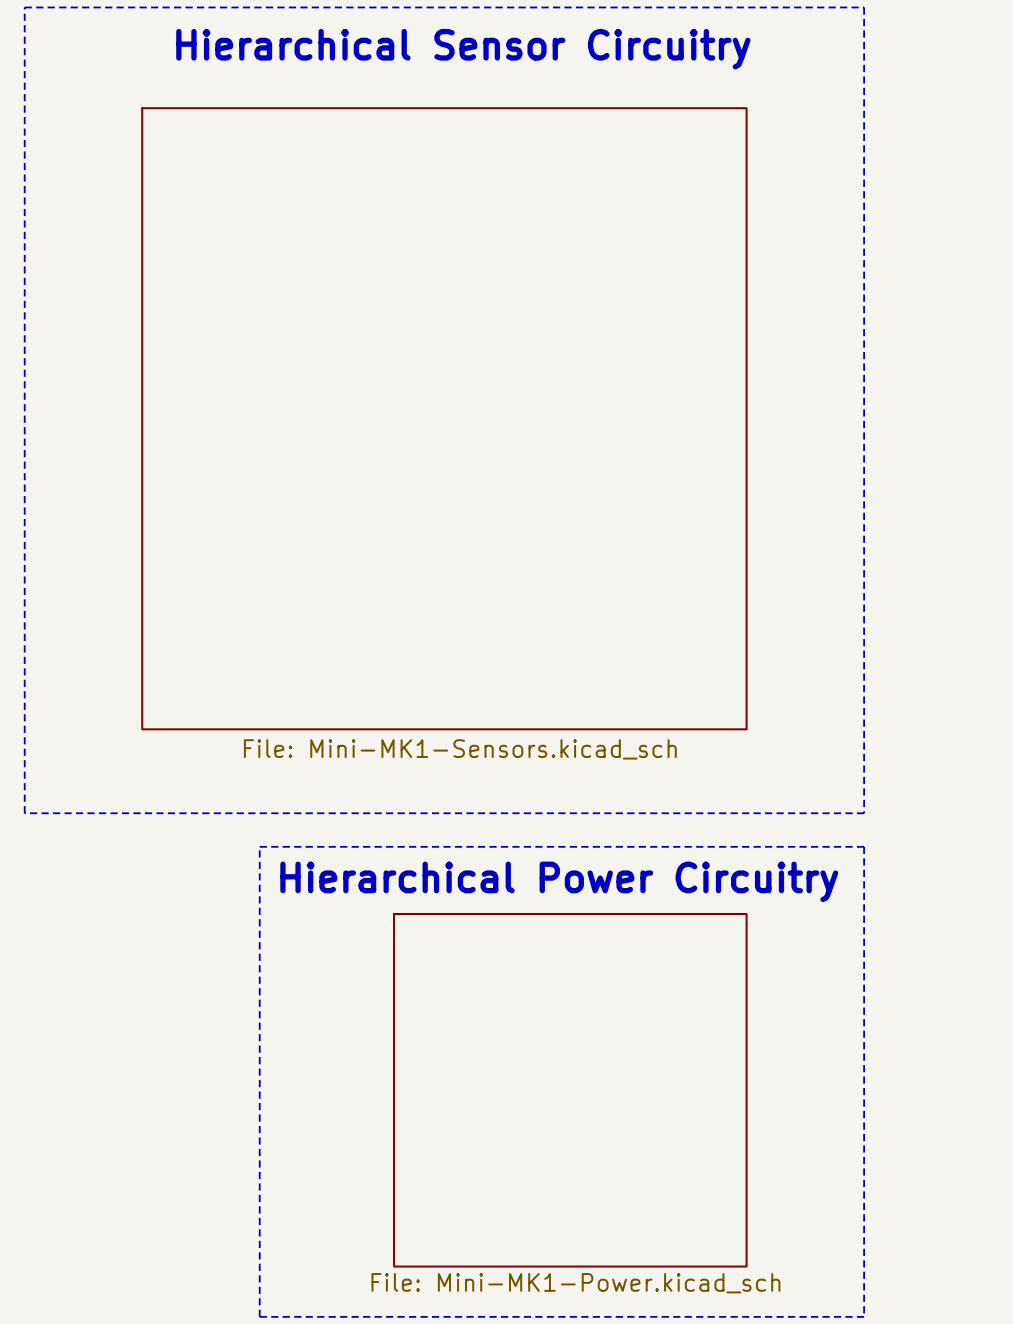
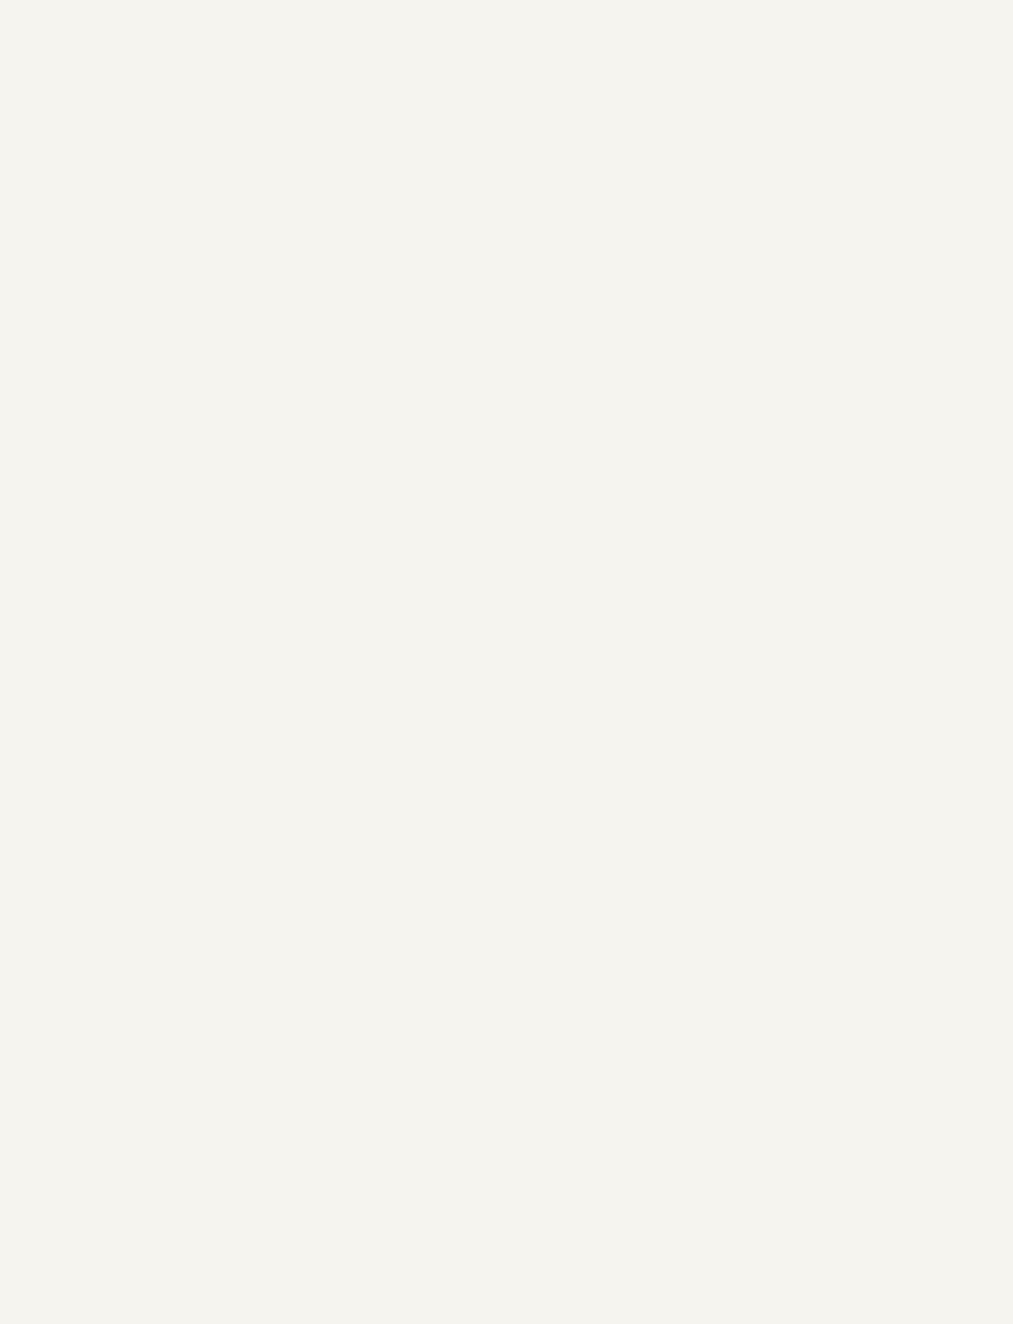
line: (24, 7) (864, 7) (864, 813) (24, 813) (24, 7) -> none
text: Hierarchical Sensor Circuitry (463, 49) -> none
sheet: File: Mini-MK1-Sensors.kicad_sch (444, 418) -> none
line: (259, 846) (864, 846) (864, 1316) (259, 1316) (259, 846) -> none
text: Hierarchical Power Circuitry (559, 881) -> none
sheet: File: Mini-MK1-Power.kicad_sch (570, 1090) -> none

